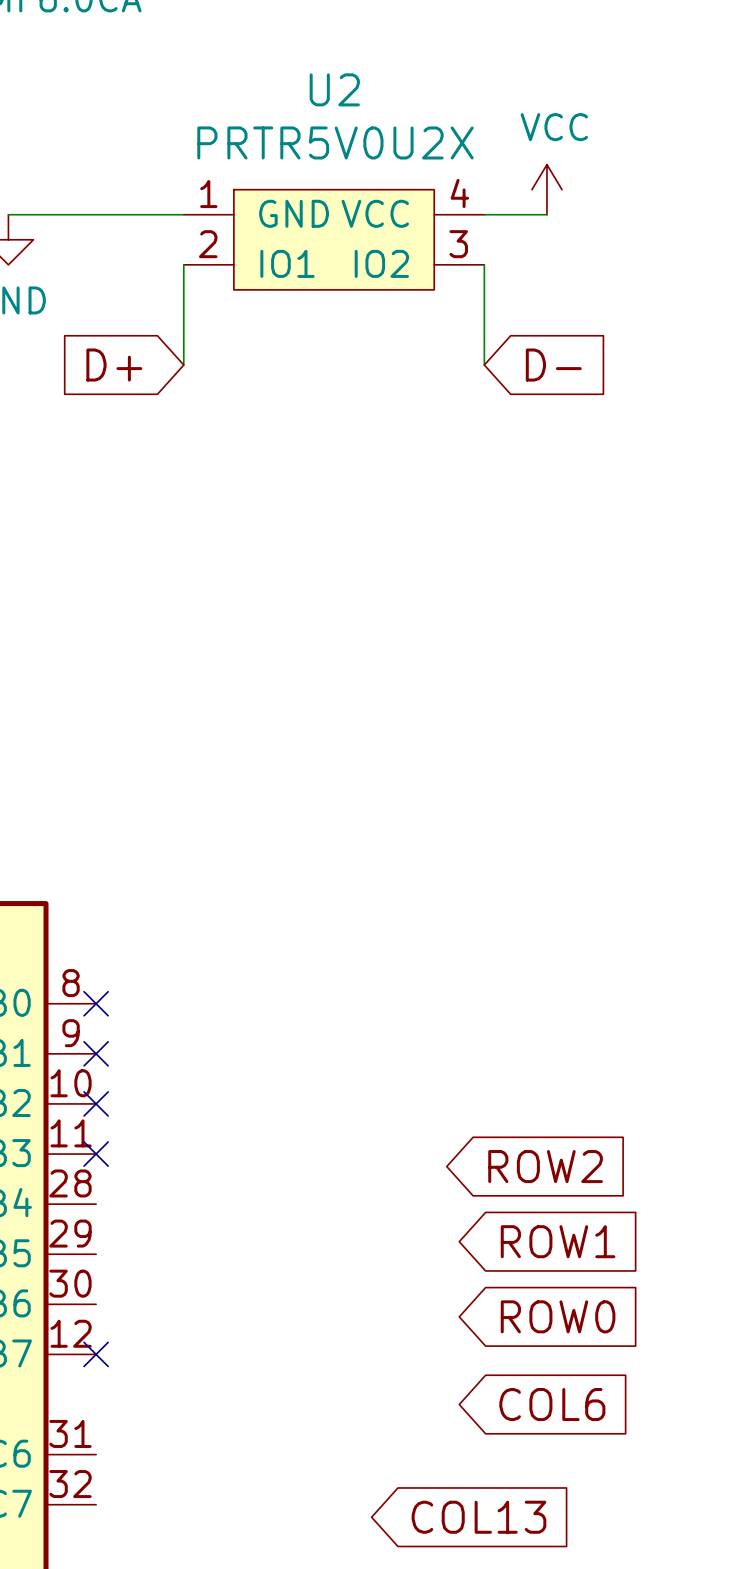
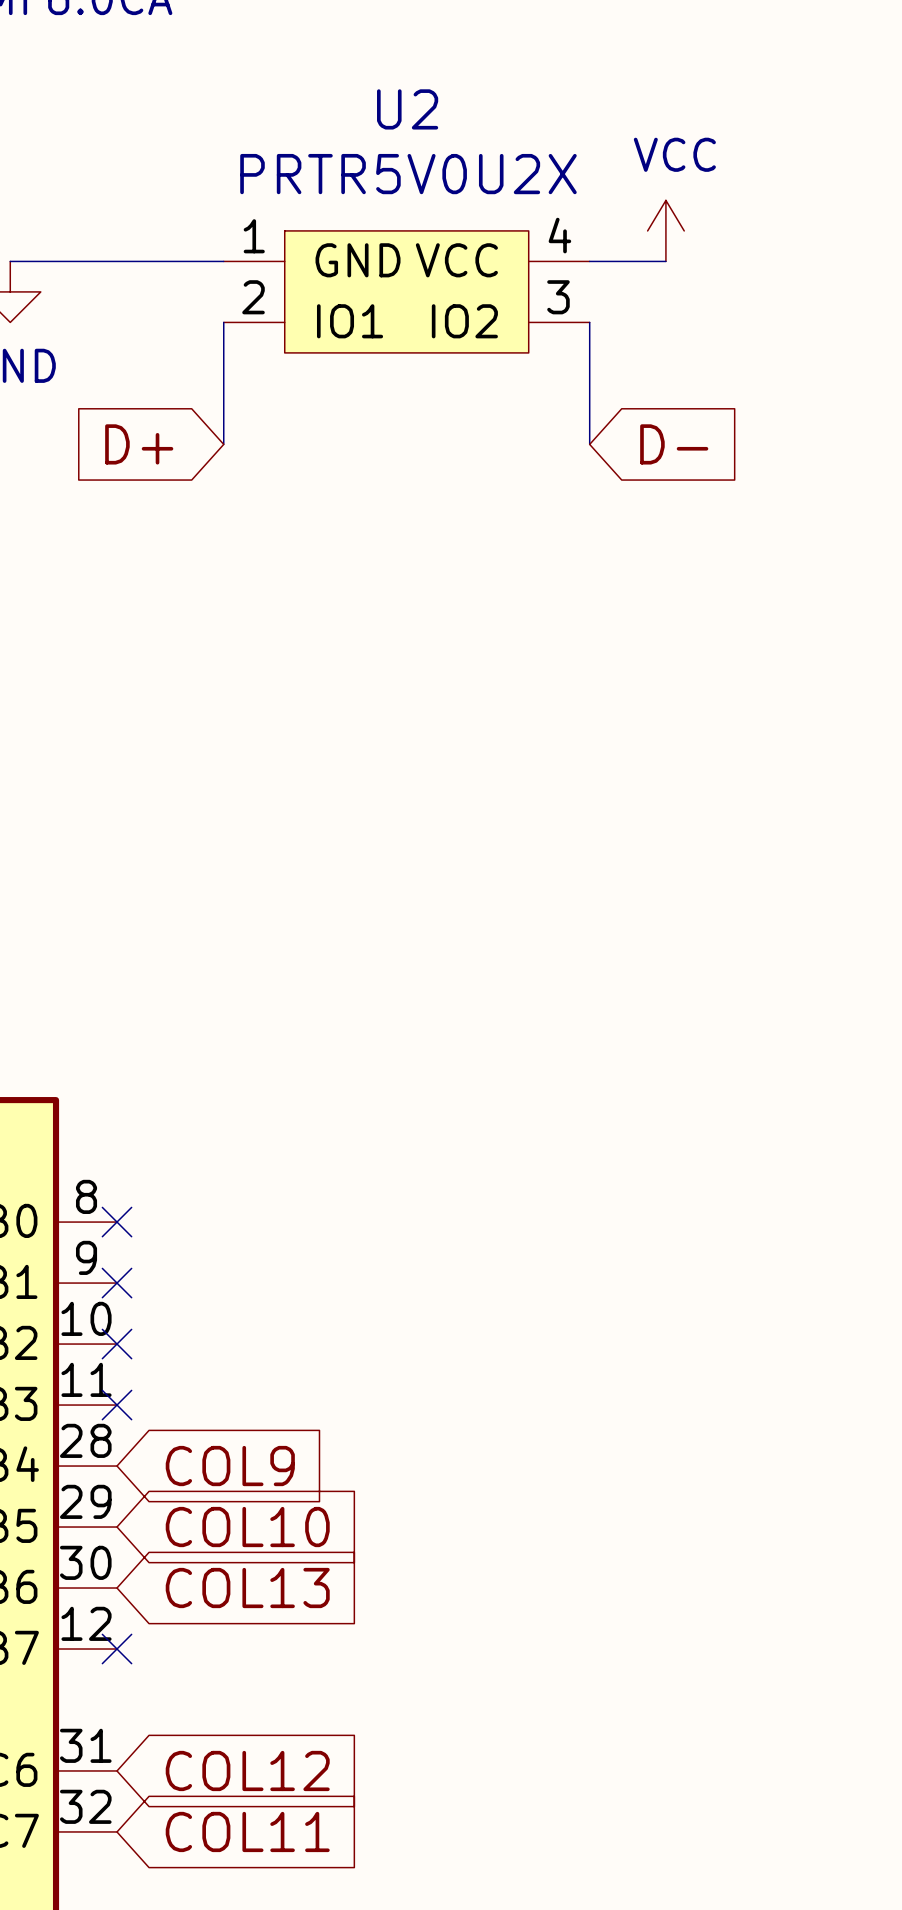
global label: ROW2 (545, 1166) -> none
global label: none -> COL9 (230, 1466)
global label: ROW1 (558, 1241) -> none
global label: none -> COL10 (247, 1527)
global label: ROW0 (558, 1316) -> none
global label: COL6 (552, 1404) -> none
global label: none -> COL12 (247, 1770)
global label: none -> COL11 (247, 1831)
global label position: COL13 (478, 1517) -> COL13 (247, 1588)

